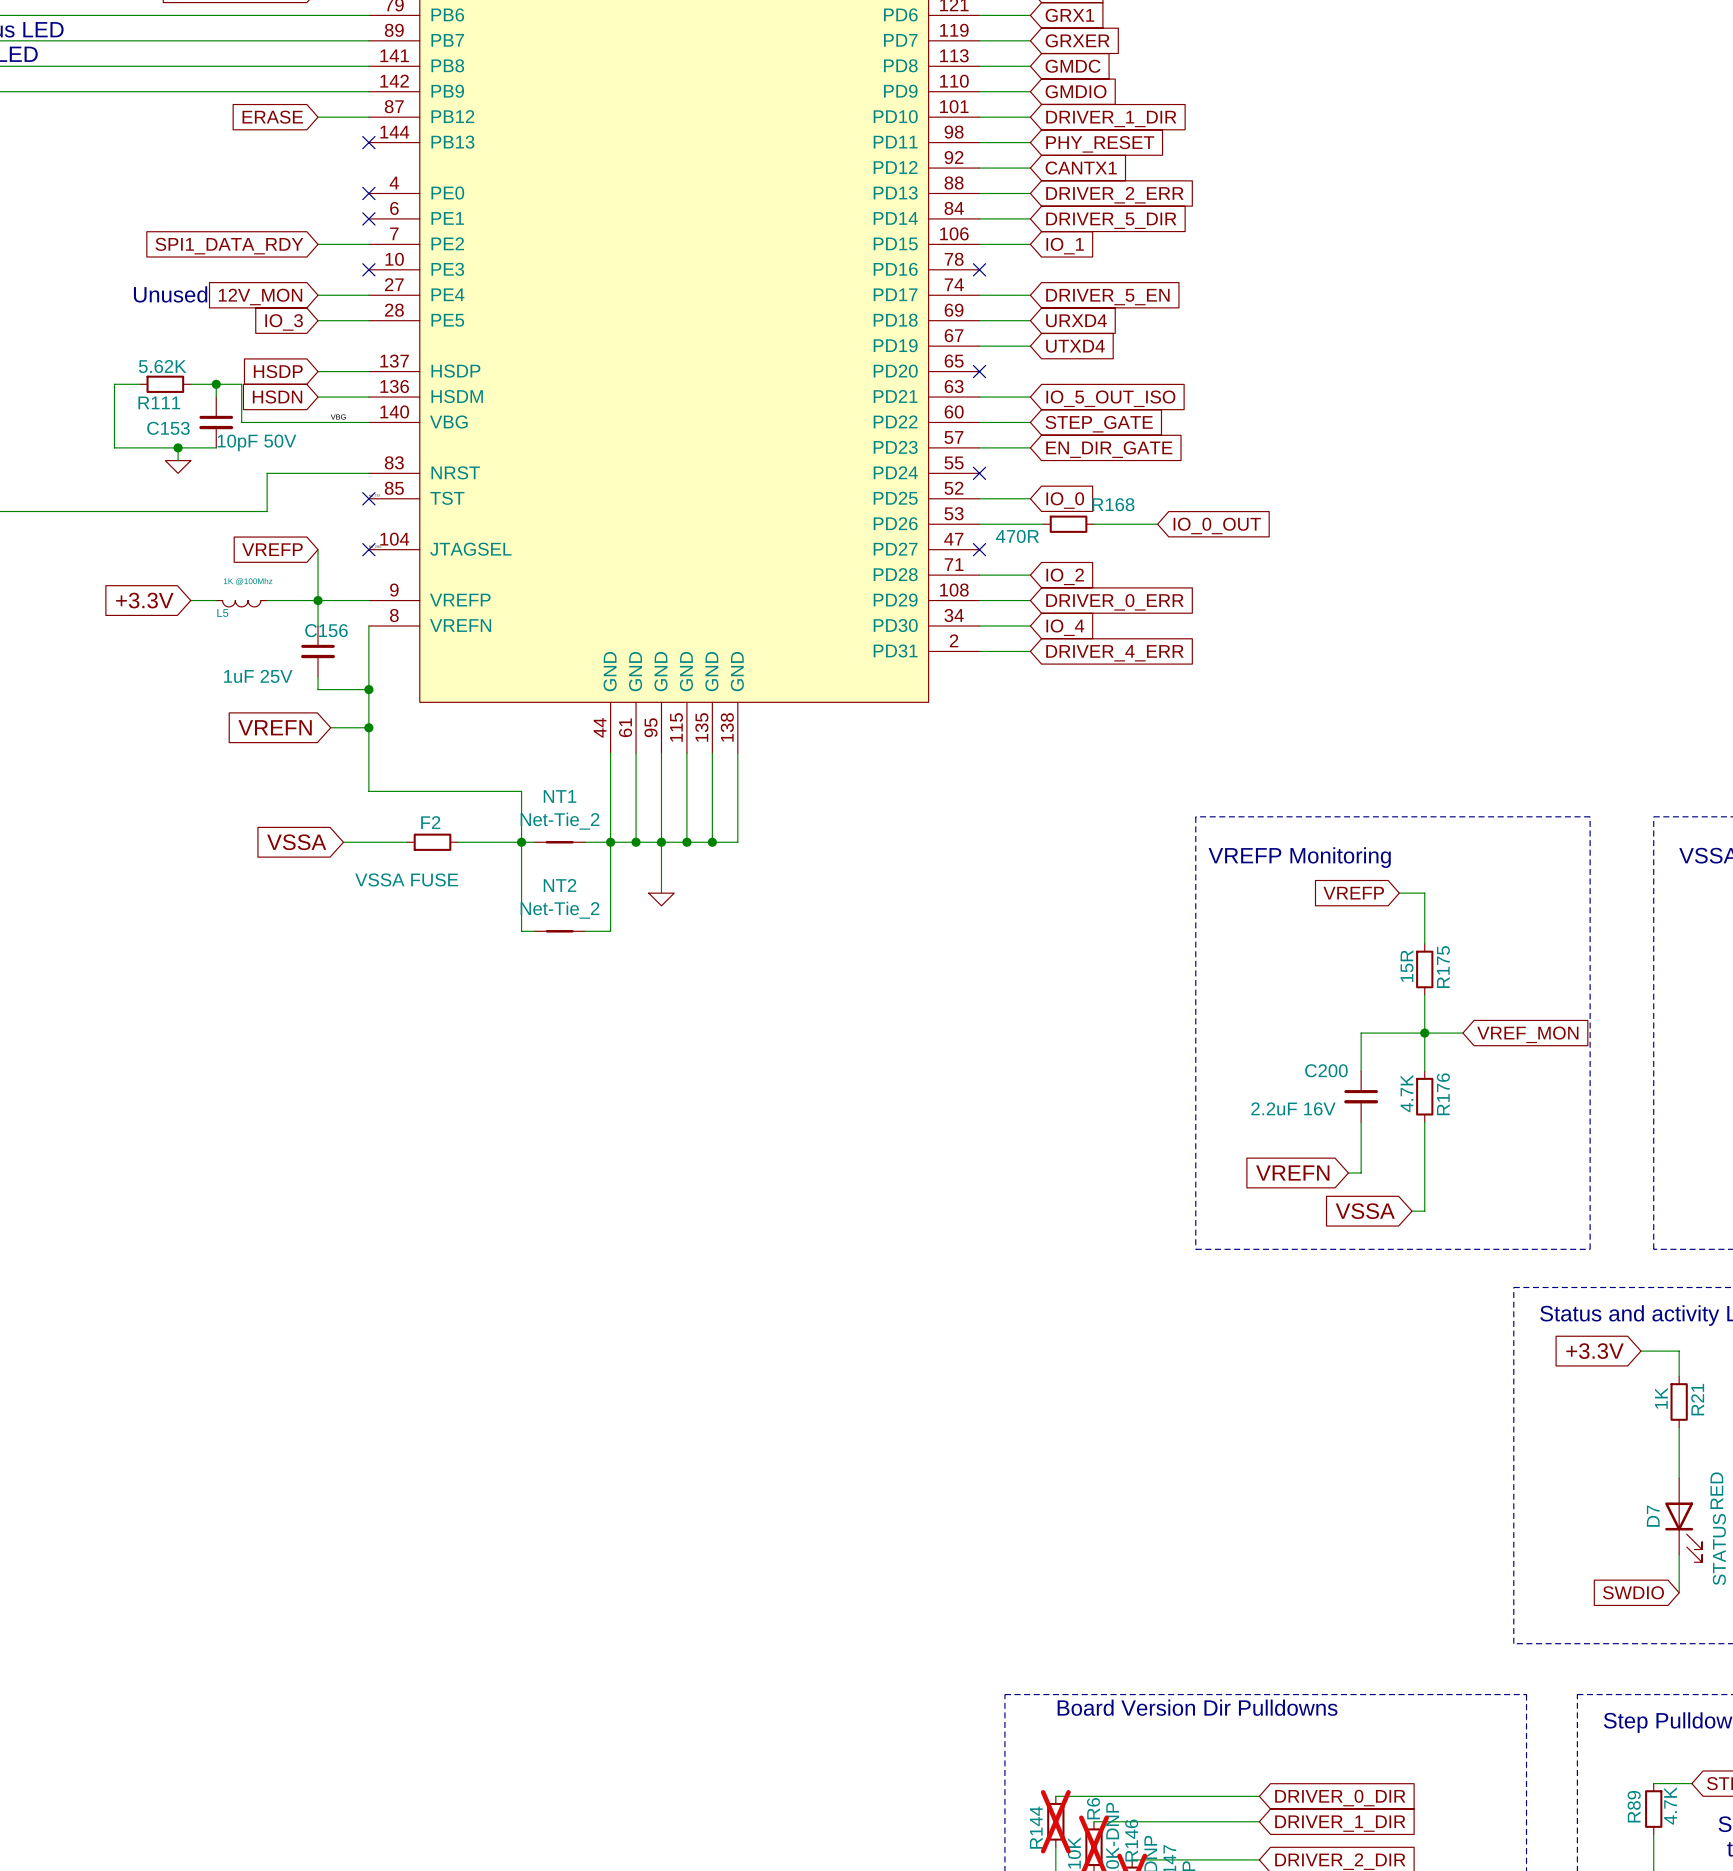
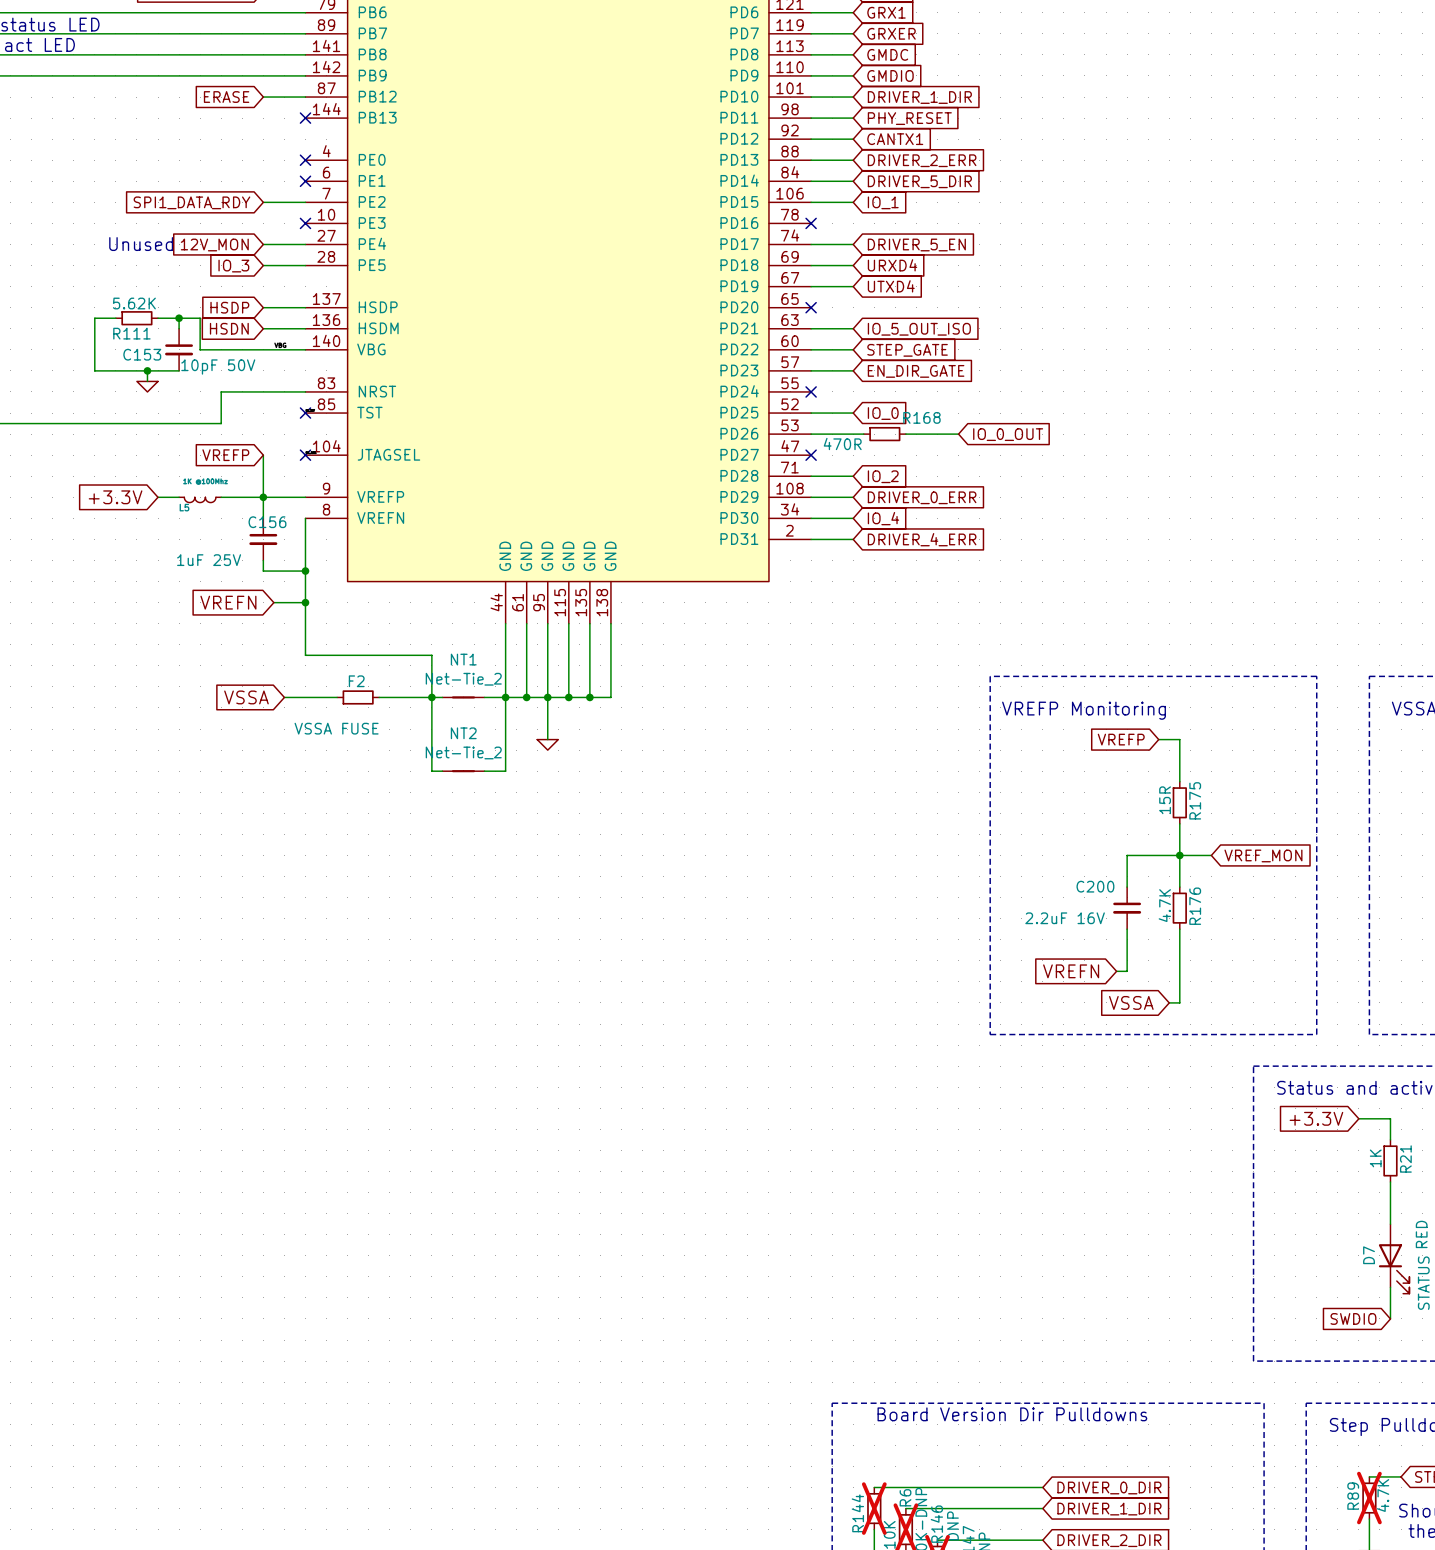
R89 do-not-place cross: none -> (1369, 1498)

